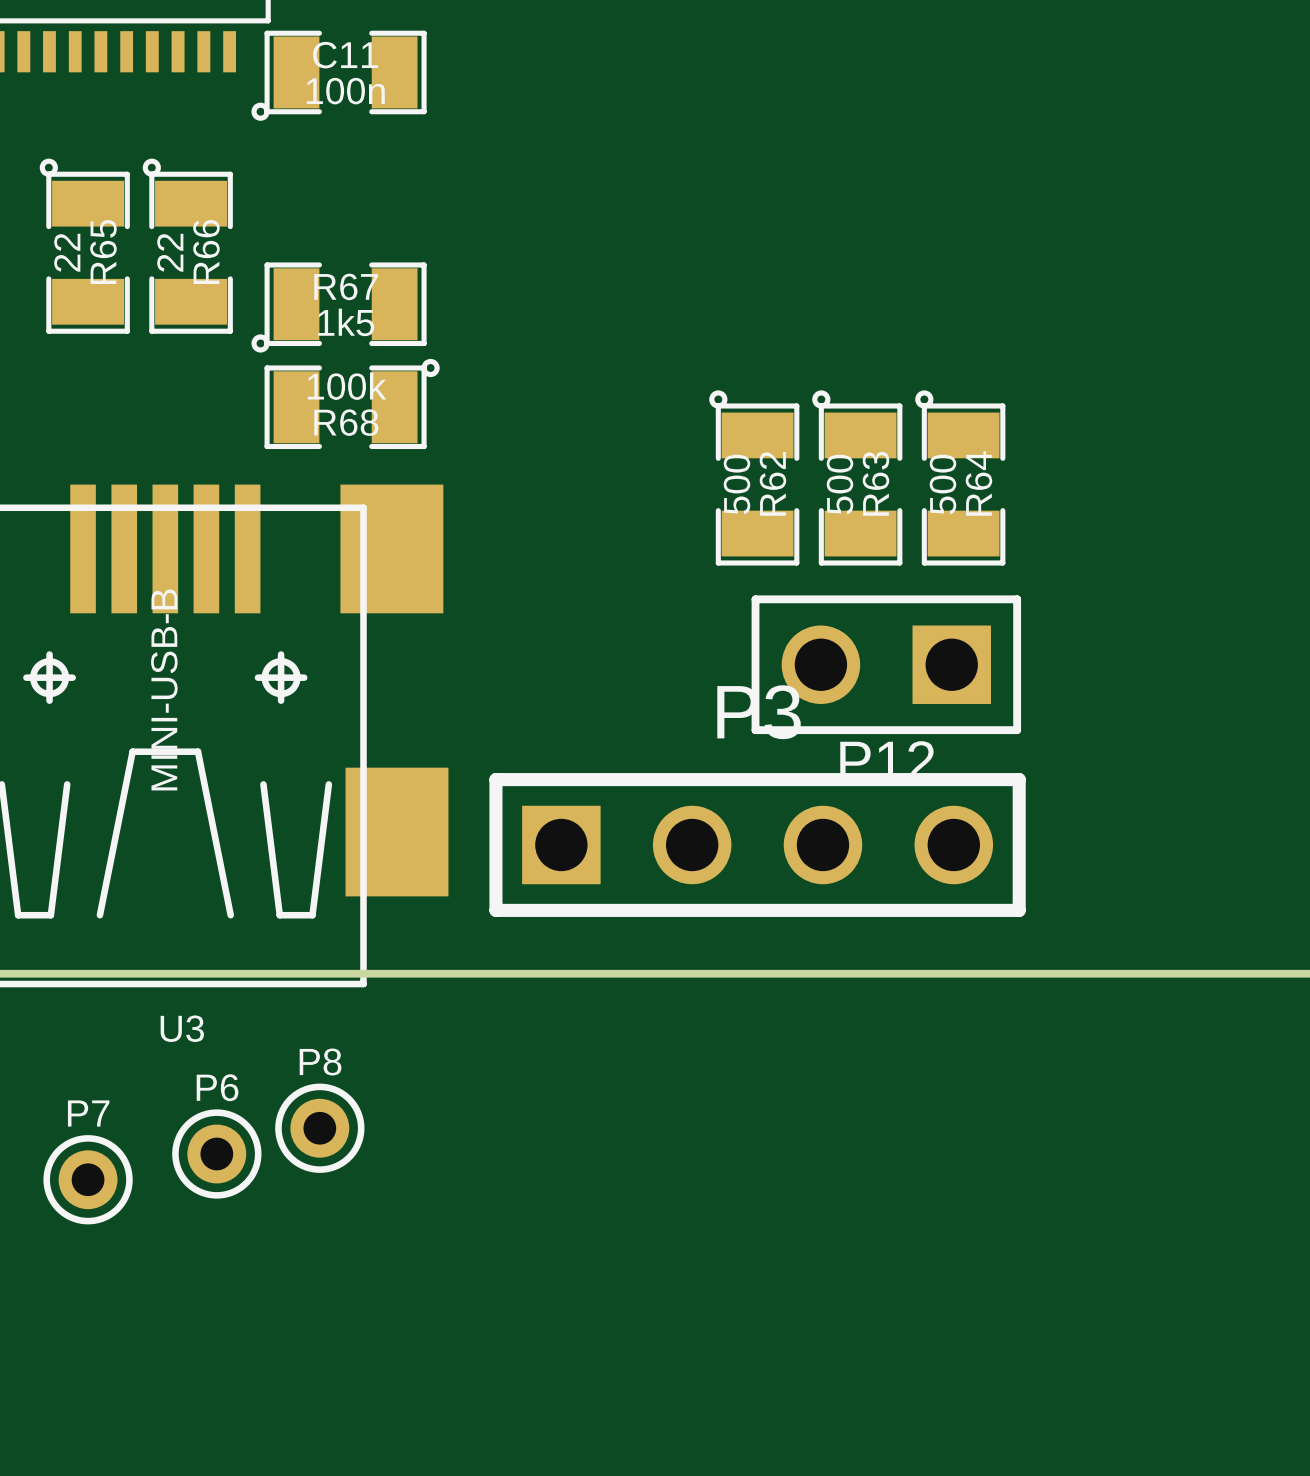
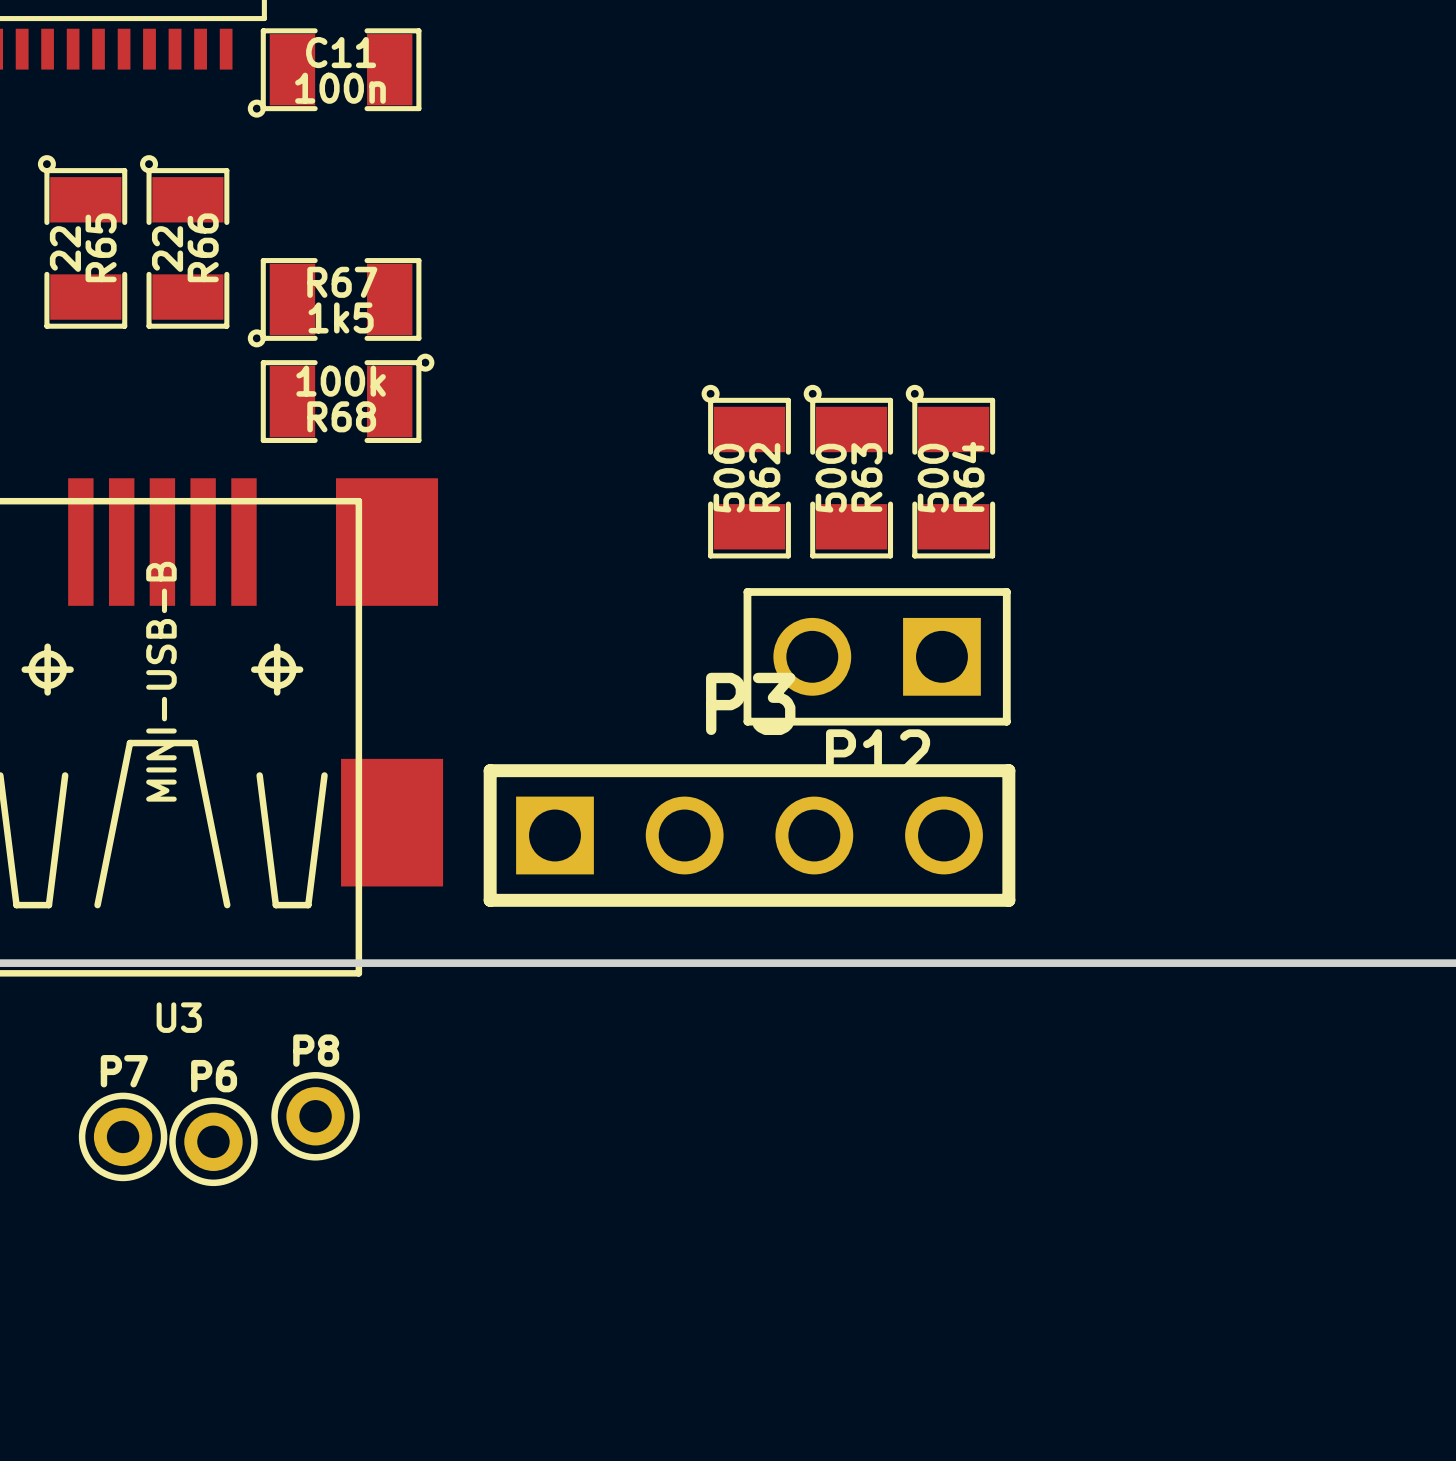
P7 position: (88, 1179) -> (123, 1136)

